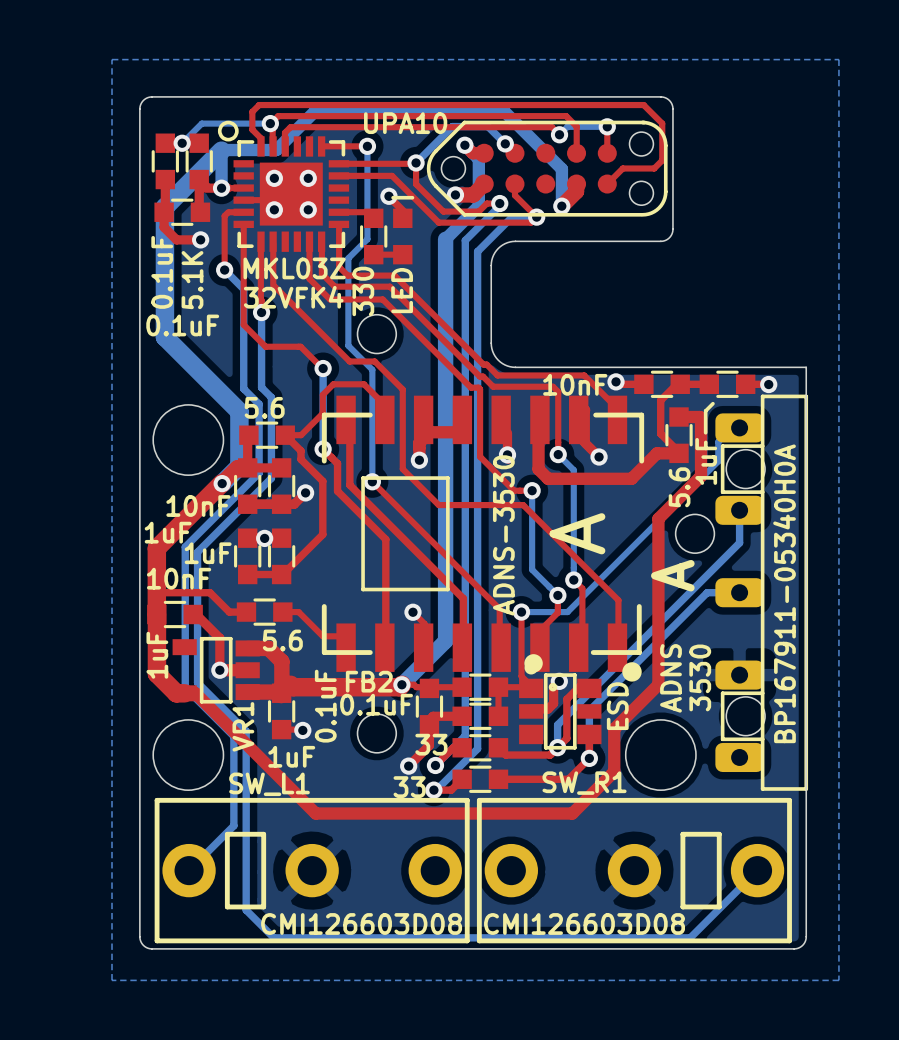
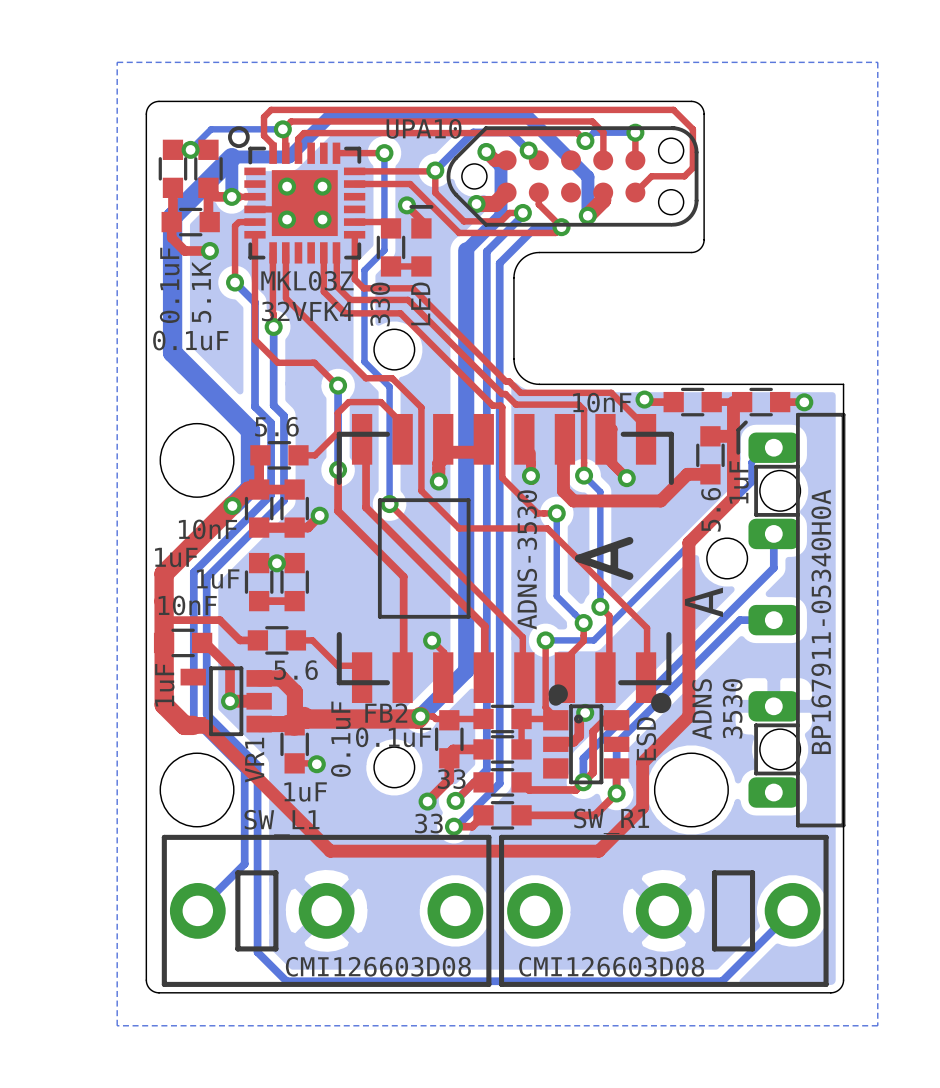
top track: (677, 384) (660, 400) (660, 433) (676, 449) -> none
top track: none -> (733, 402) (733, 437)
top track: (285, 435) (301, 450) (301, 459) (322, 481) (322, 534) (284, 573) -> none
top track: (323, 449) (337, 463) (337, 491) (385, 539) (385, 551) -> (338, 469) (338, 511) (403, 576)

